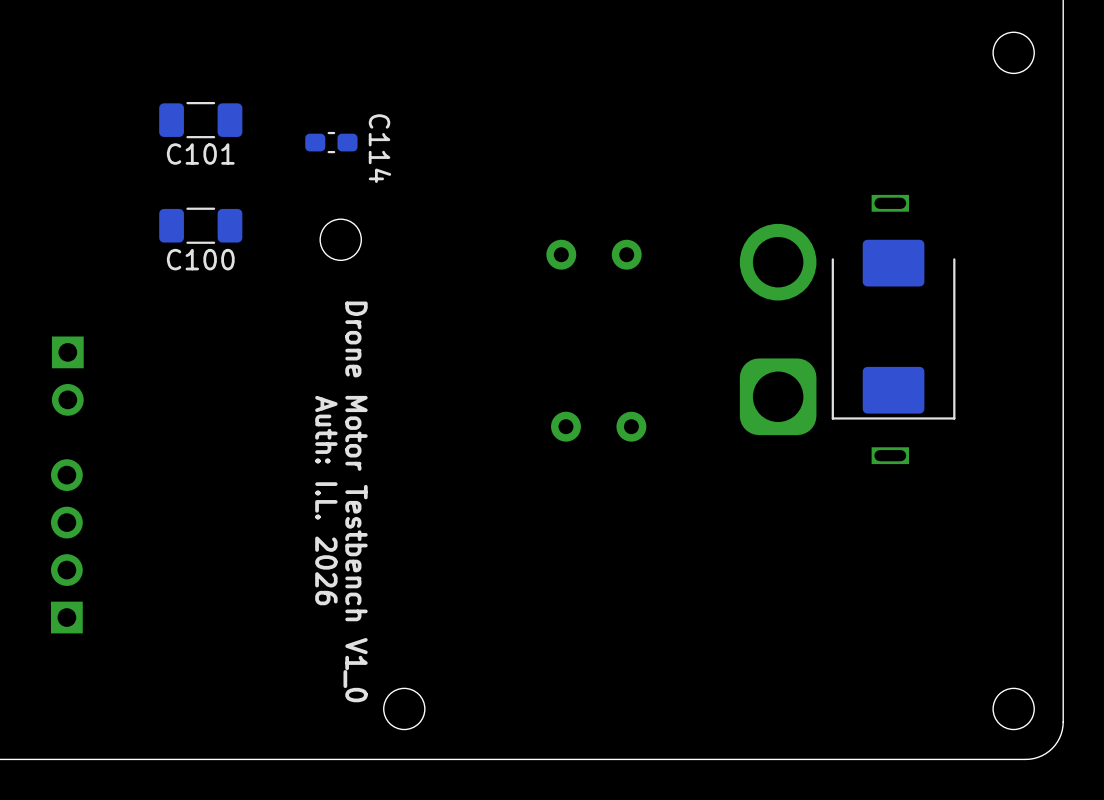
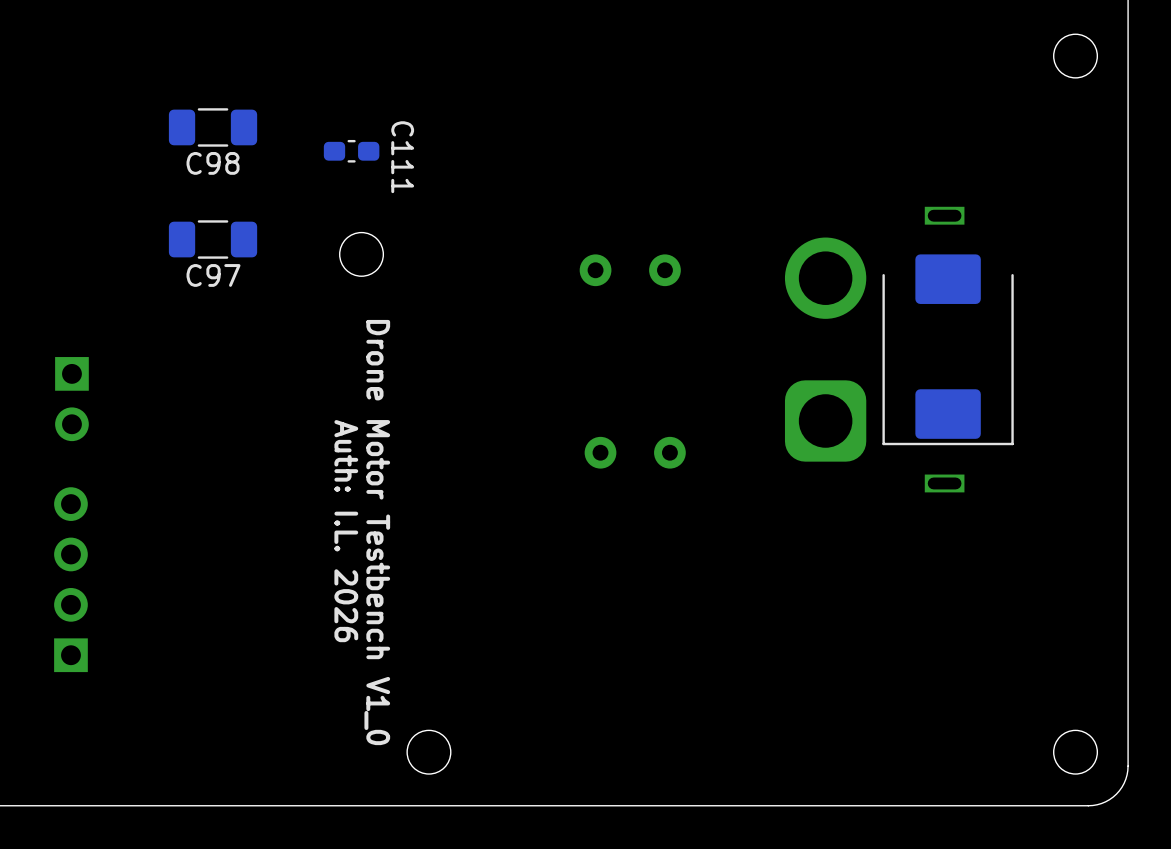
C114 name: C114 (379, 148) -> C111 (402, 157)
C101 name: C101 (200, 154) -> C98 (213, 163)
C100 name: C100 (200, 259) -> C97 (213, 275)

